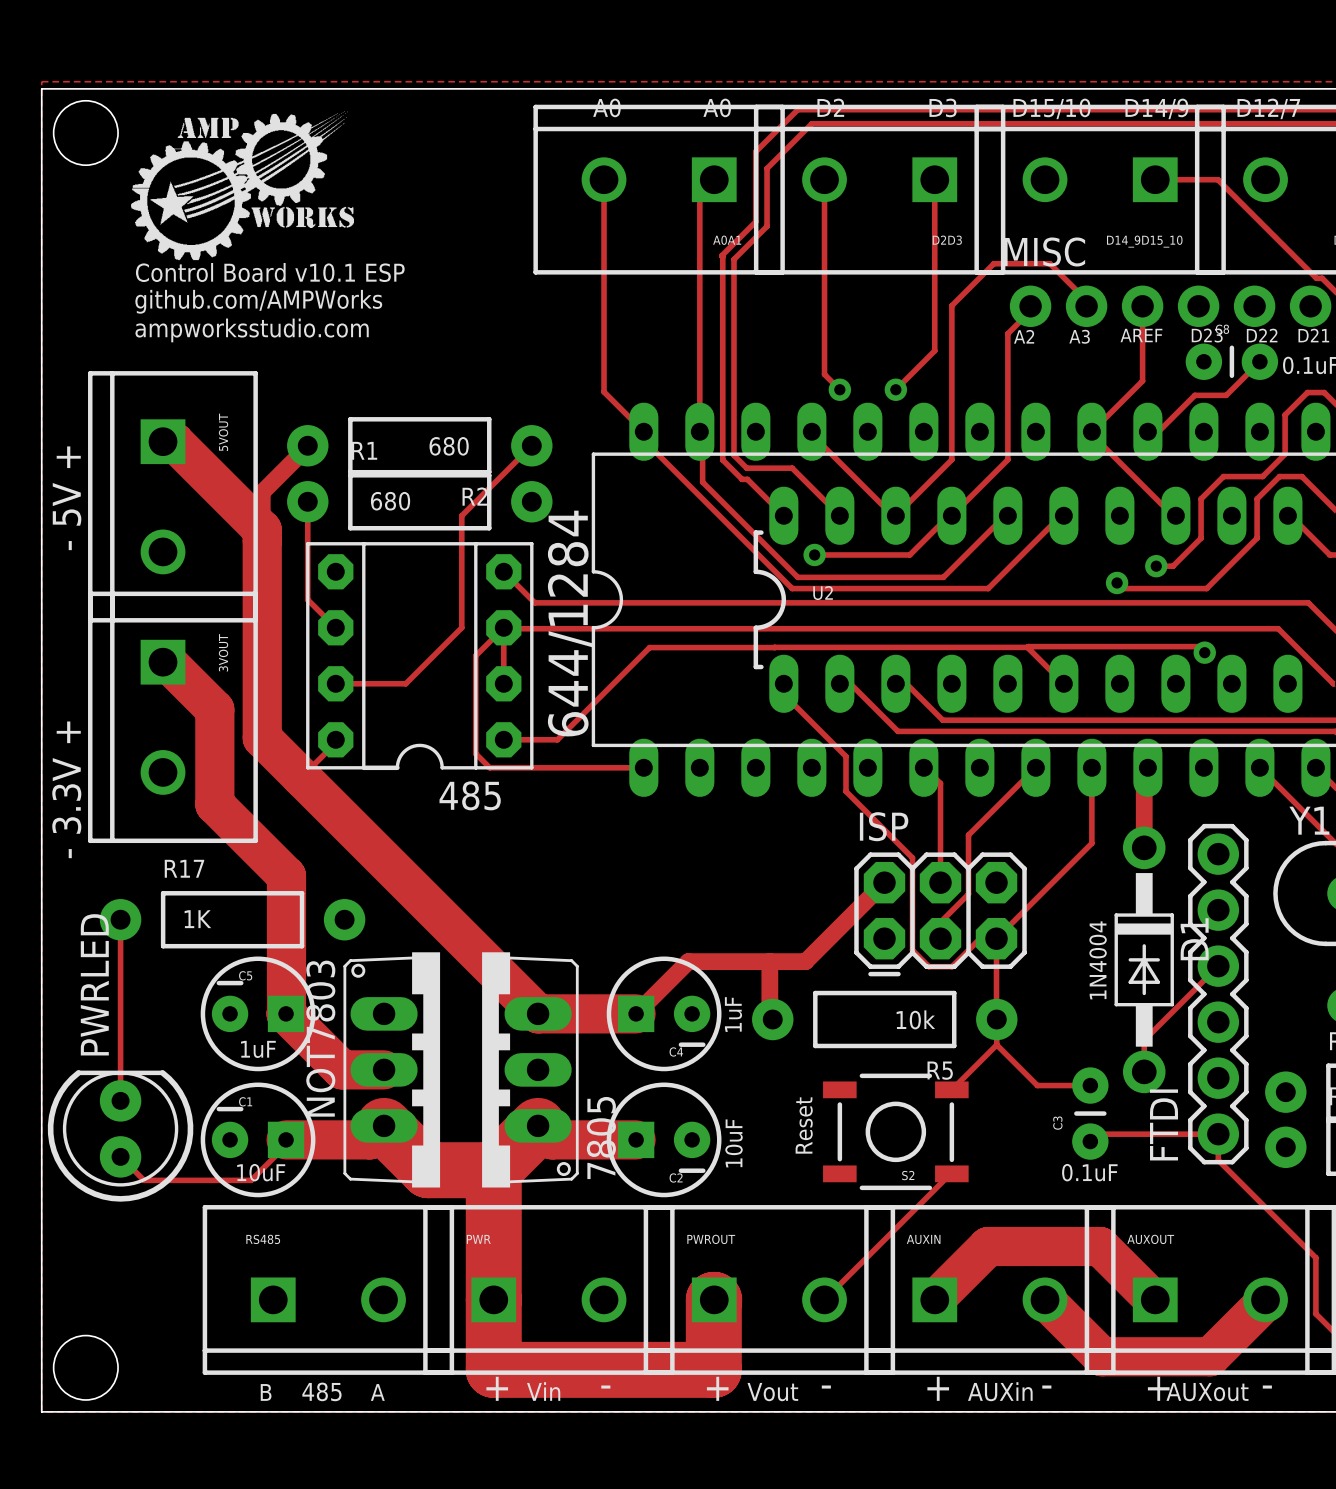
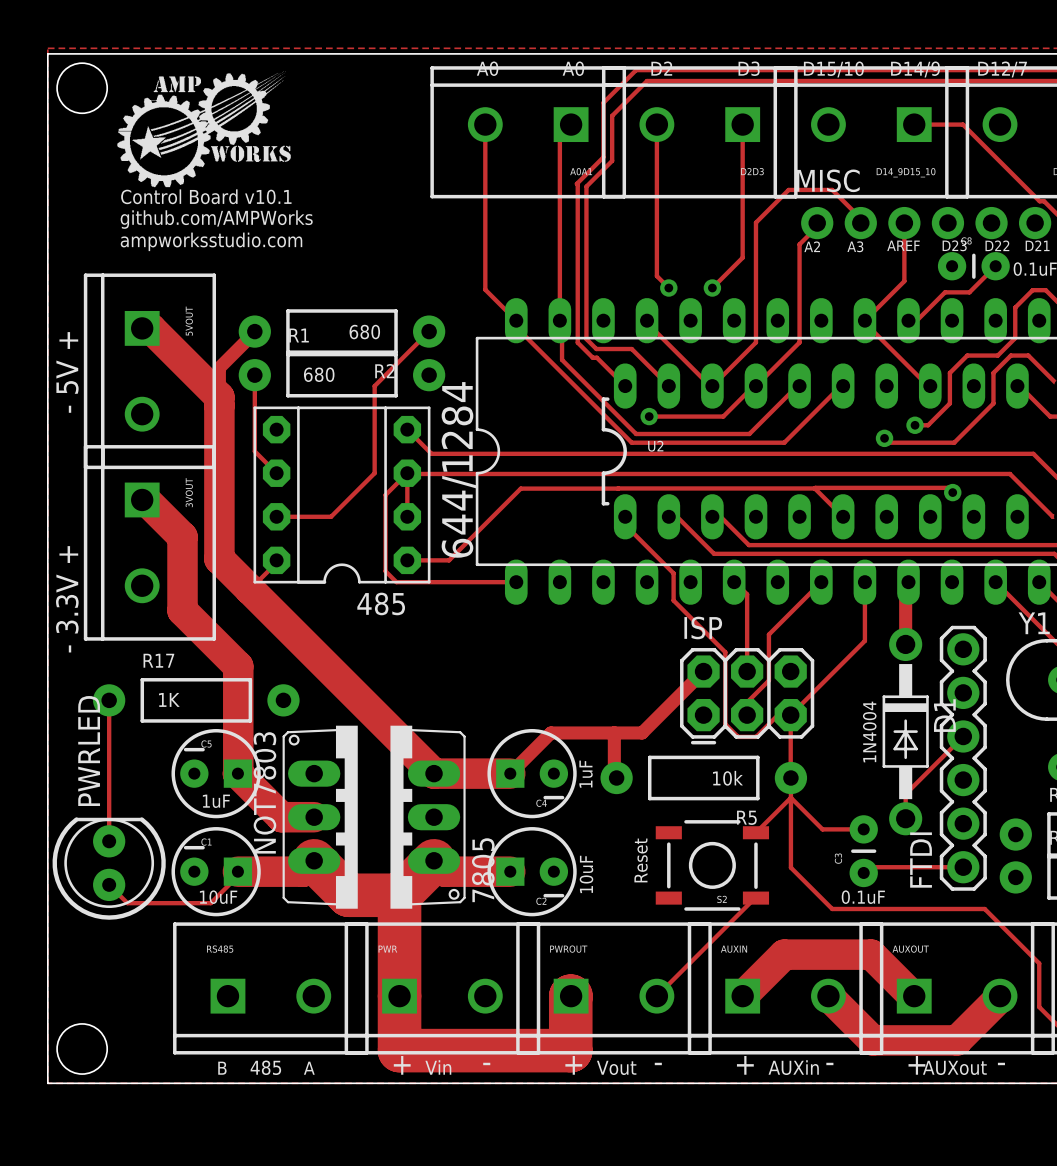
text: Control Board v10.1 ESP (270, 272) -> Control Board v10.1 (206, 196)
track: (1218, 1134) (1218, 1160) (1245, 1187) -> (790, 797) (790, 867) (832, 909) (984, 909)

